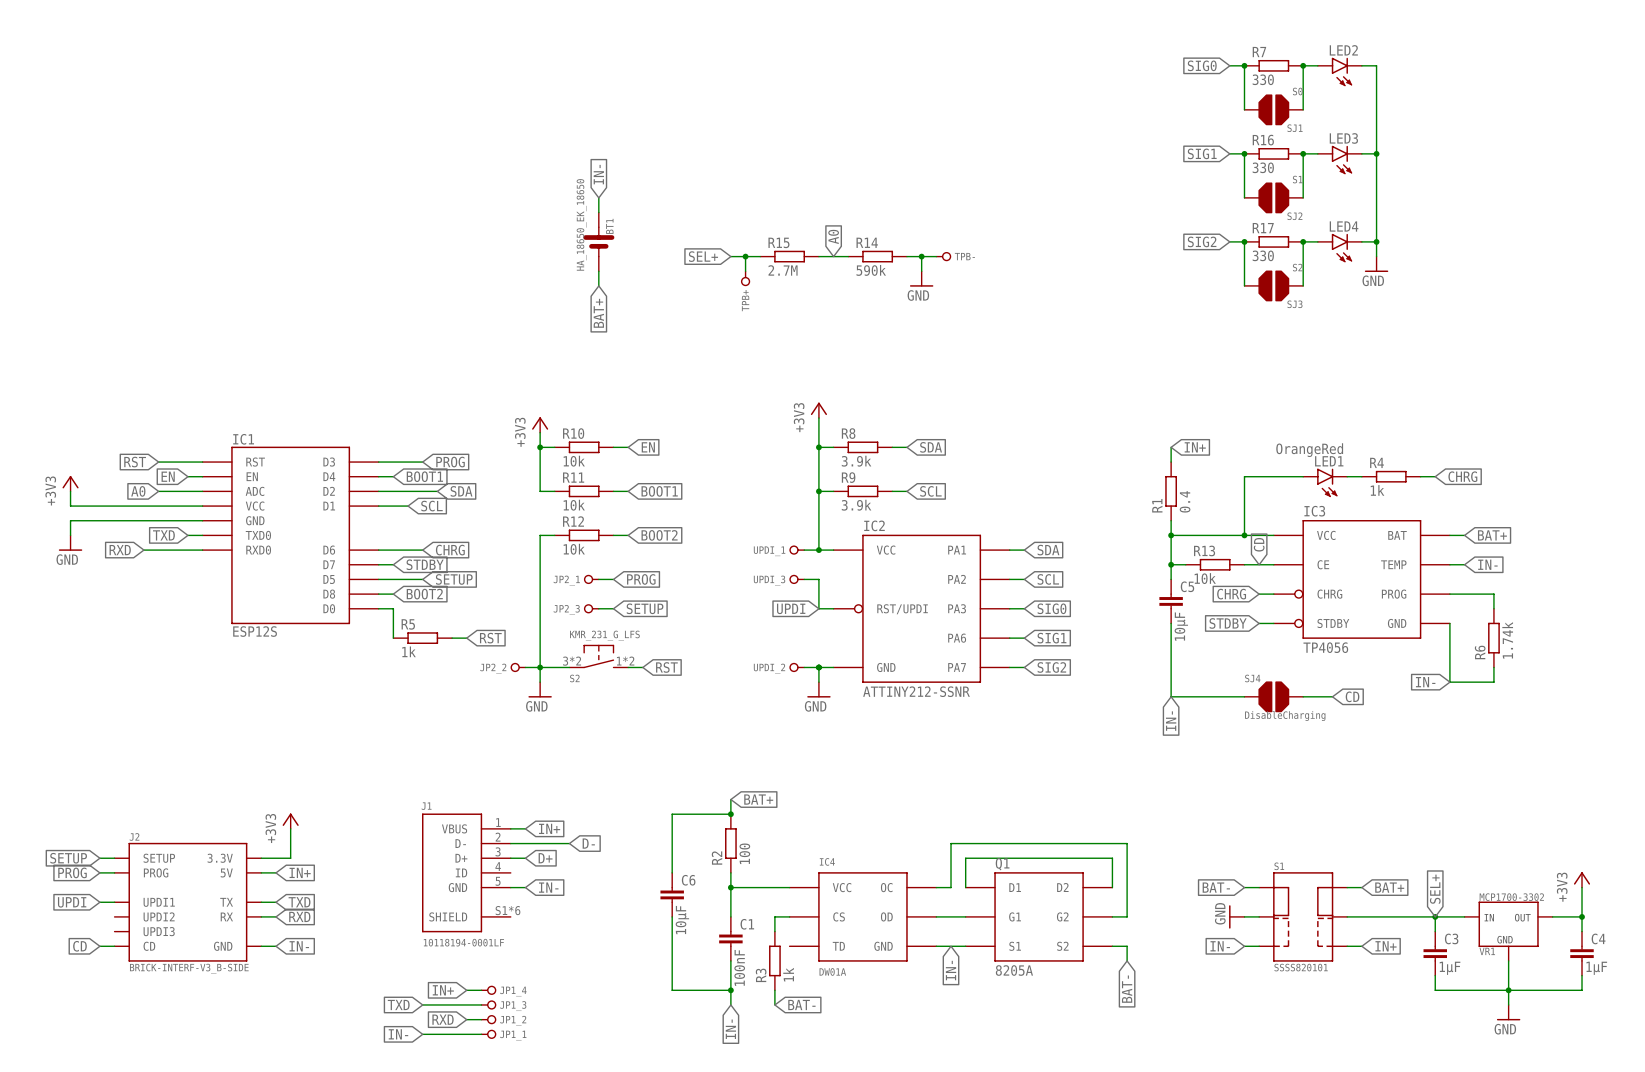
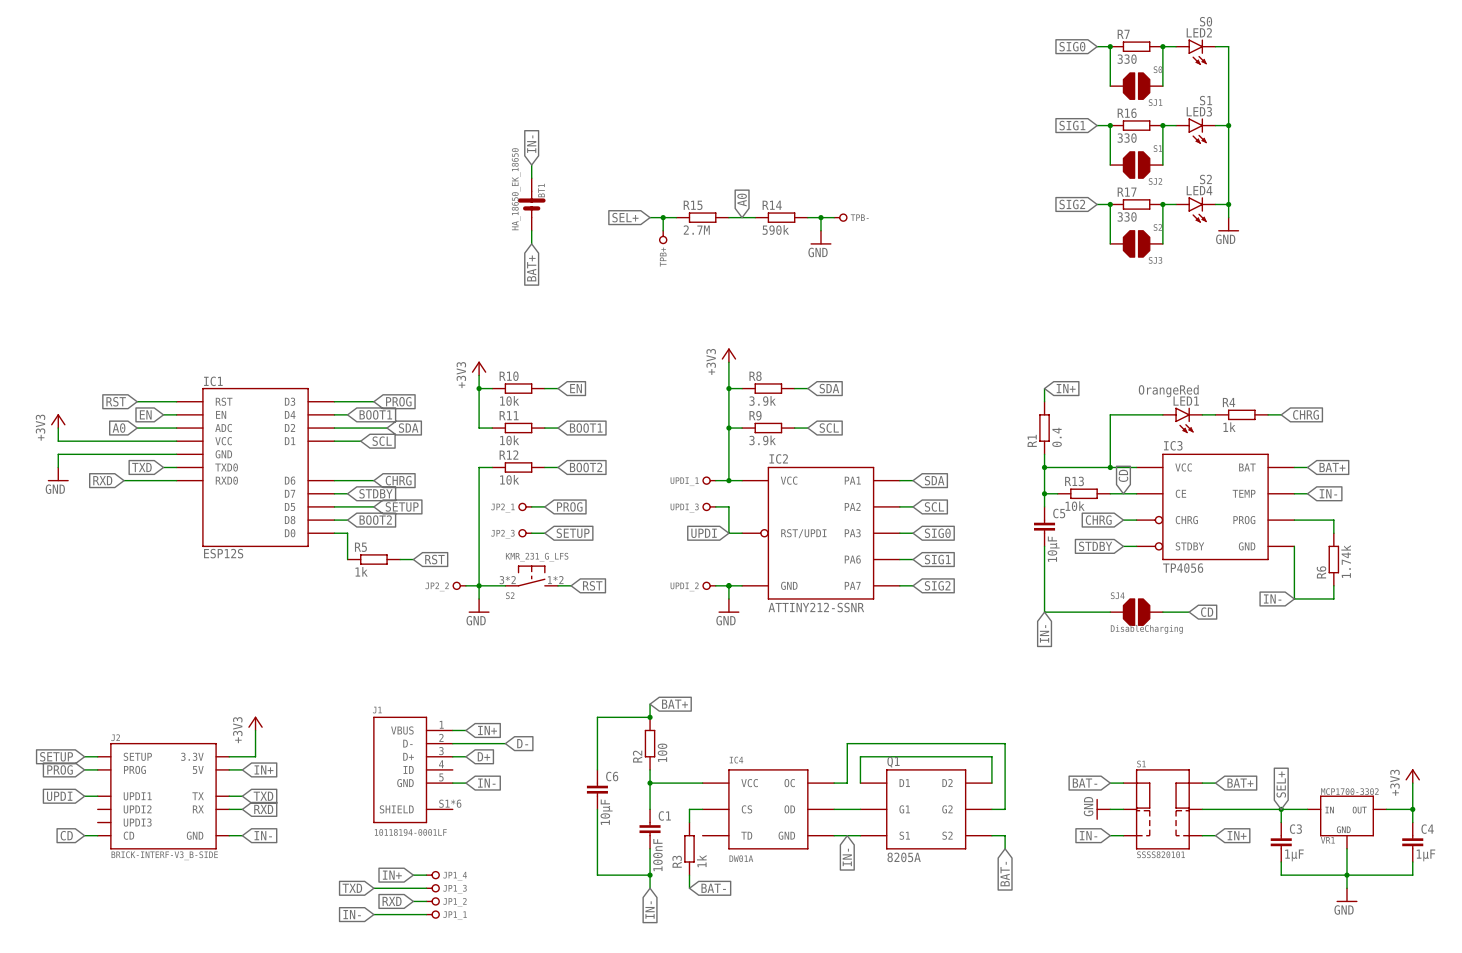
LED2 value: none -> S0 (1206, 21)
LED3 value: none -> S1 (1206, 100)
LED4 value: none -> S2 (1205, 179)

